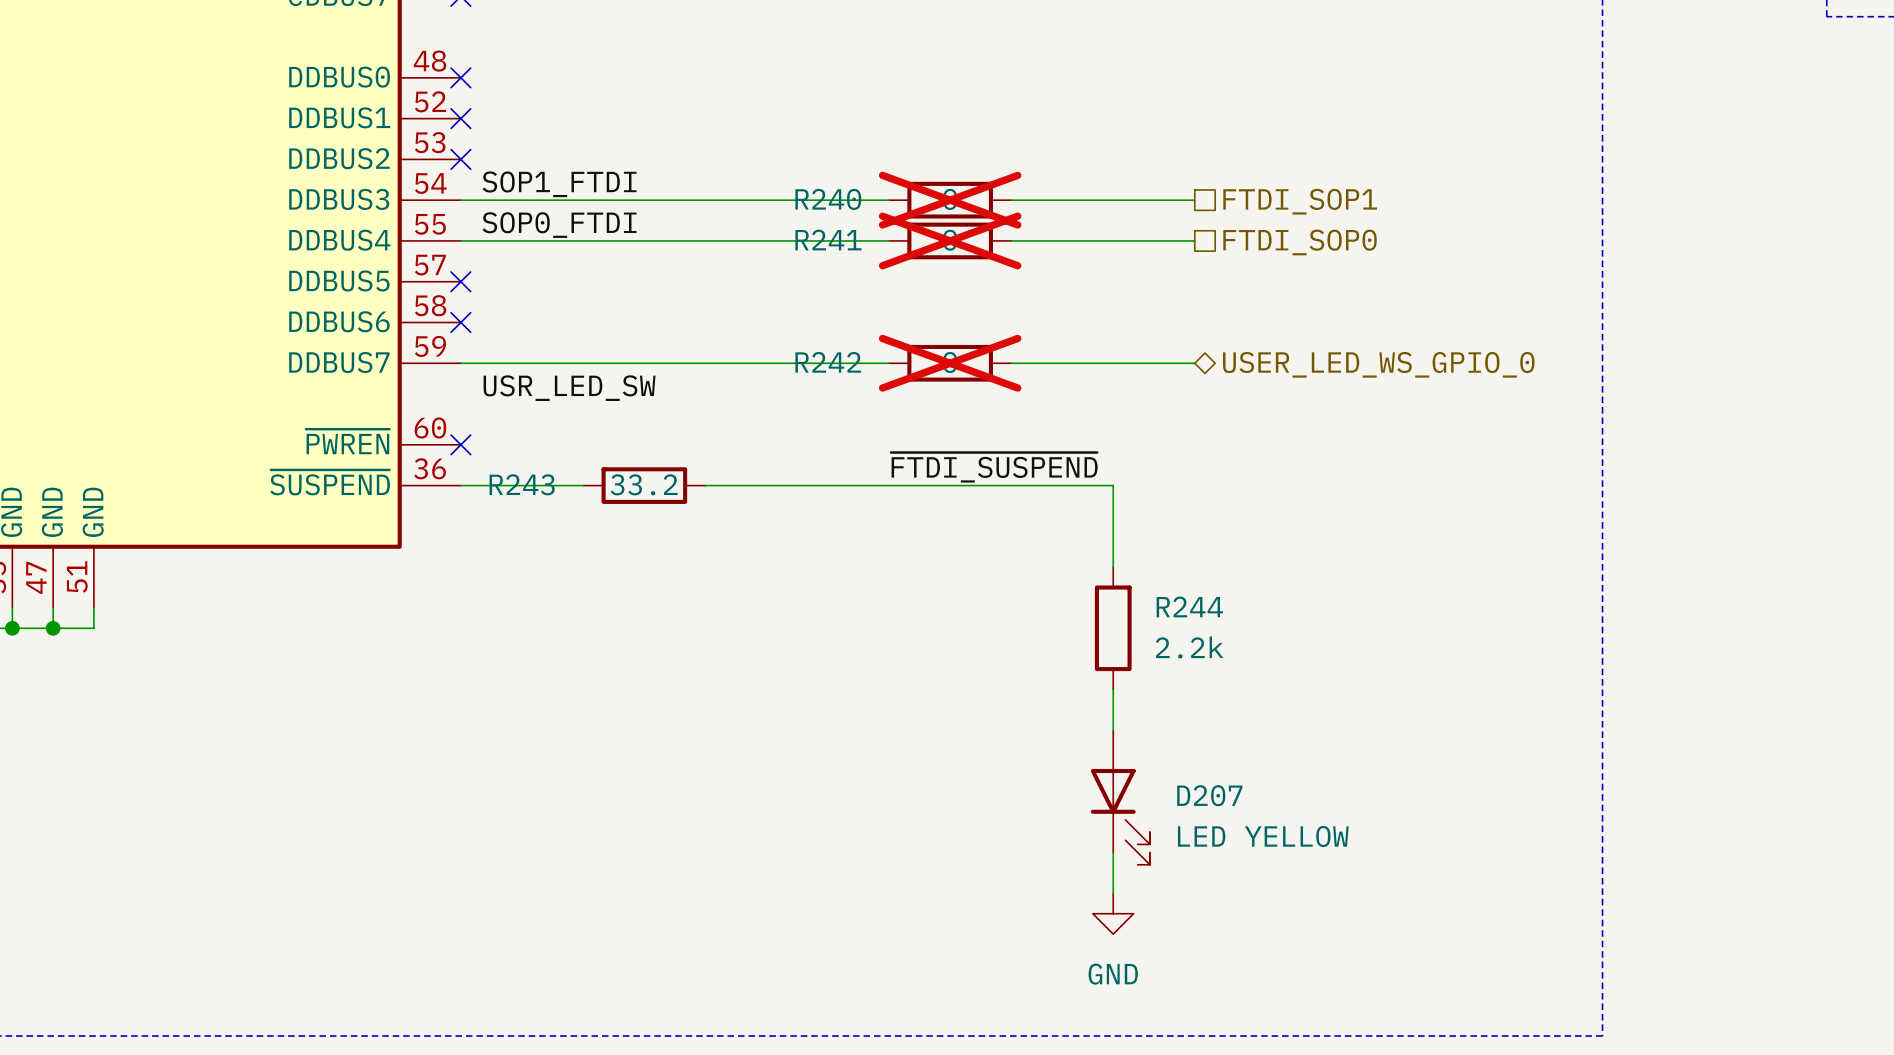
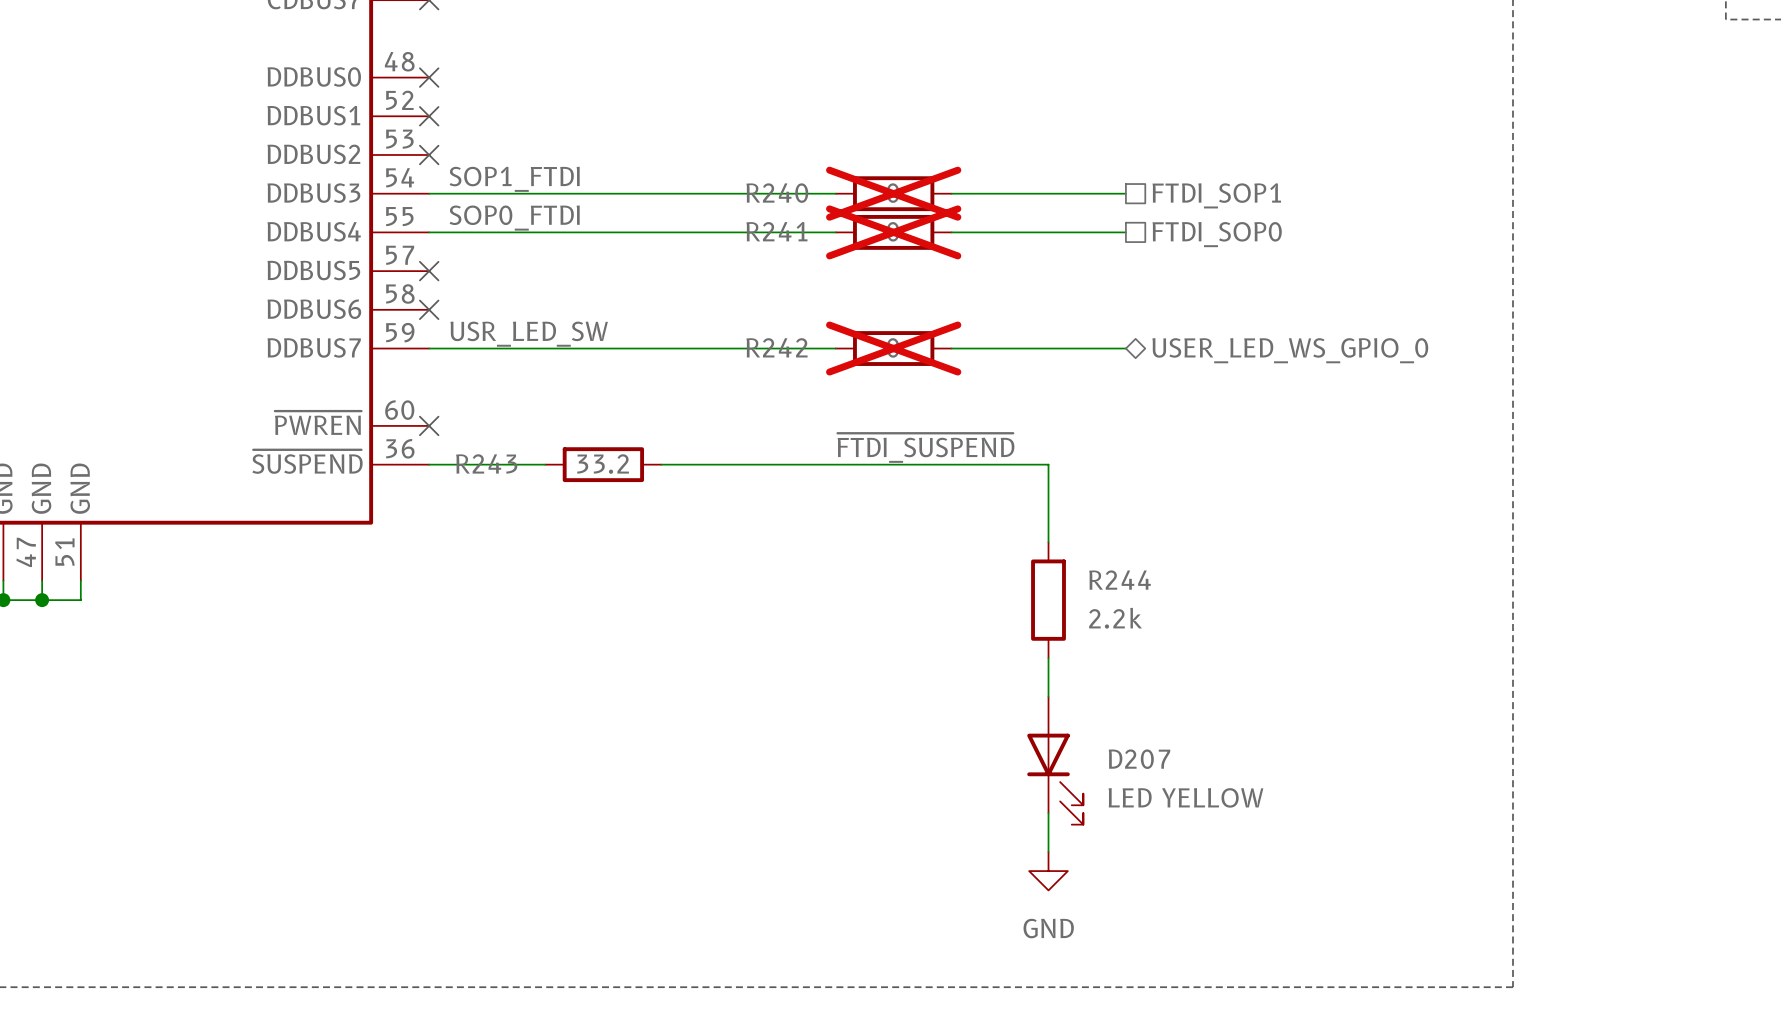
label position: USR_LED_SW (569, 388) -> USR_LED_SW (529, 334)

